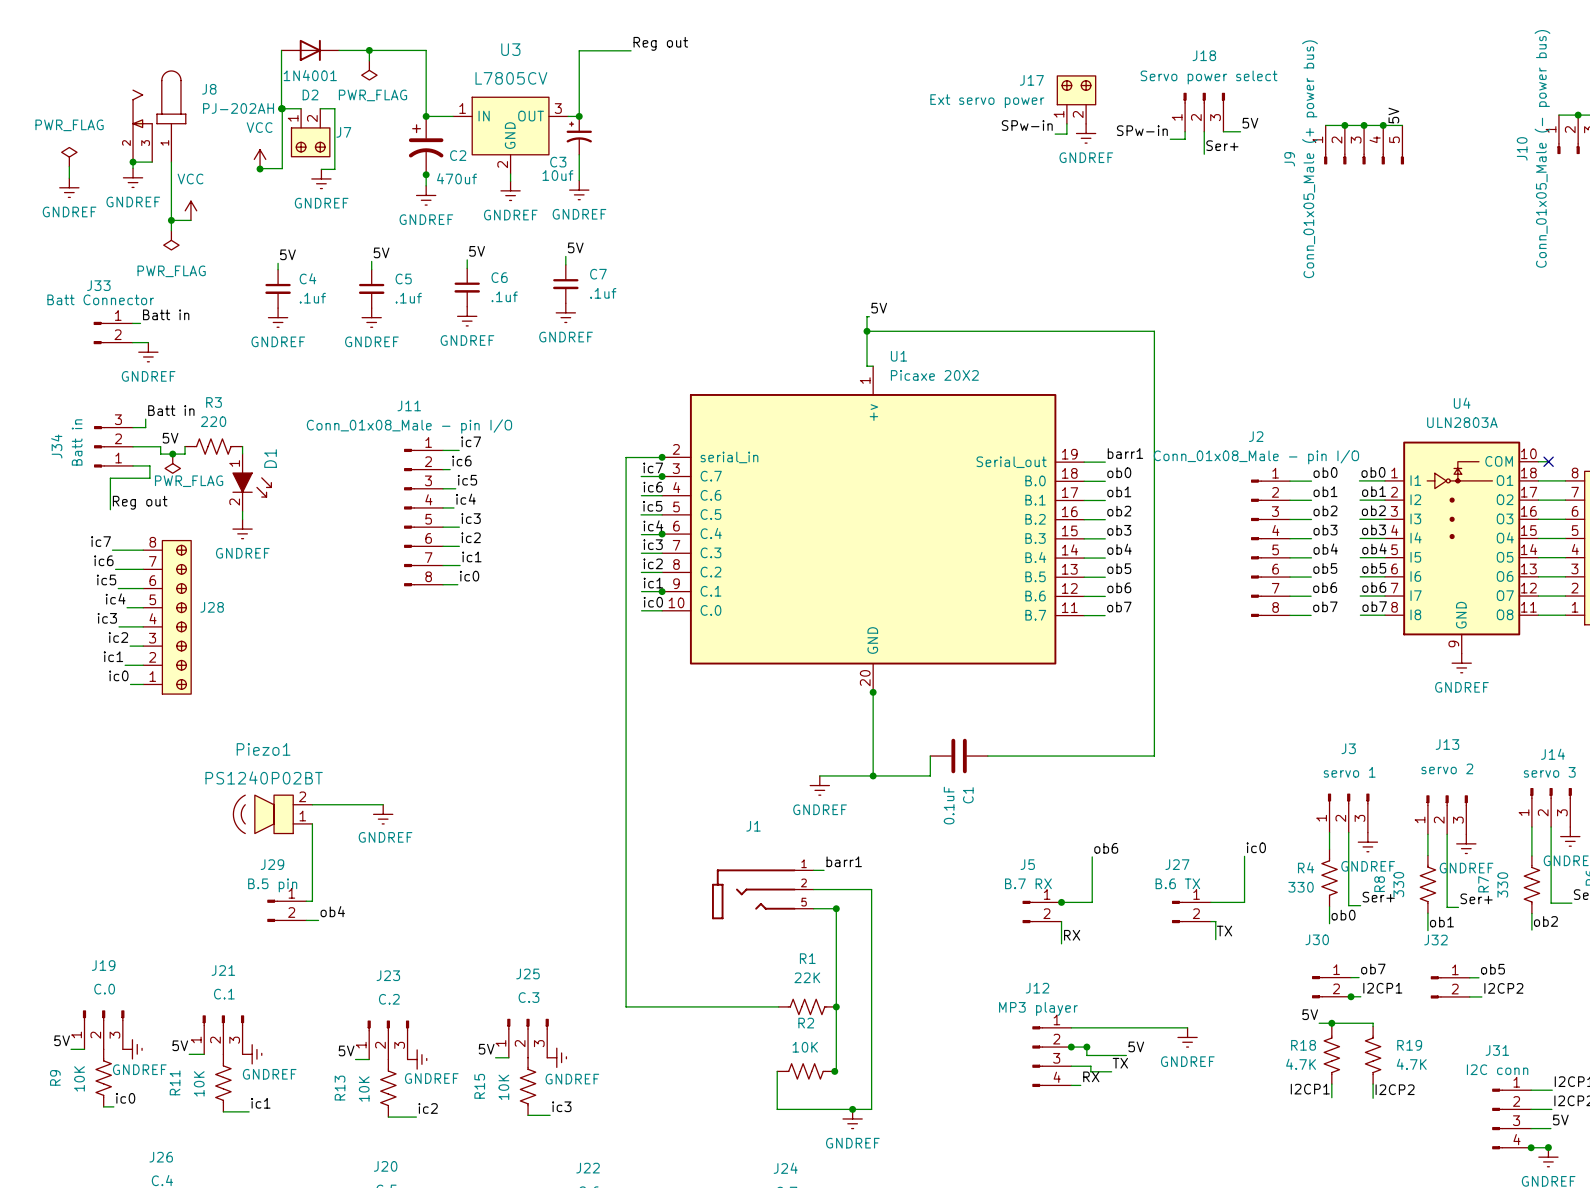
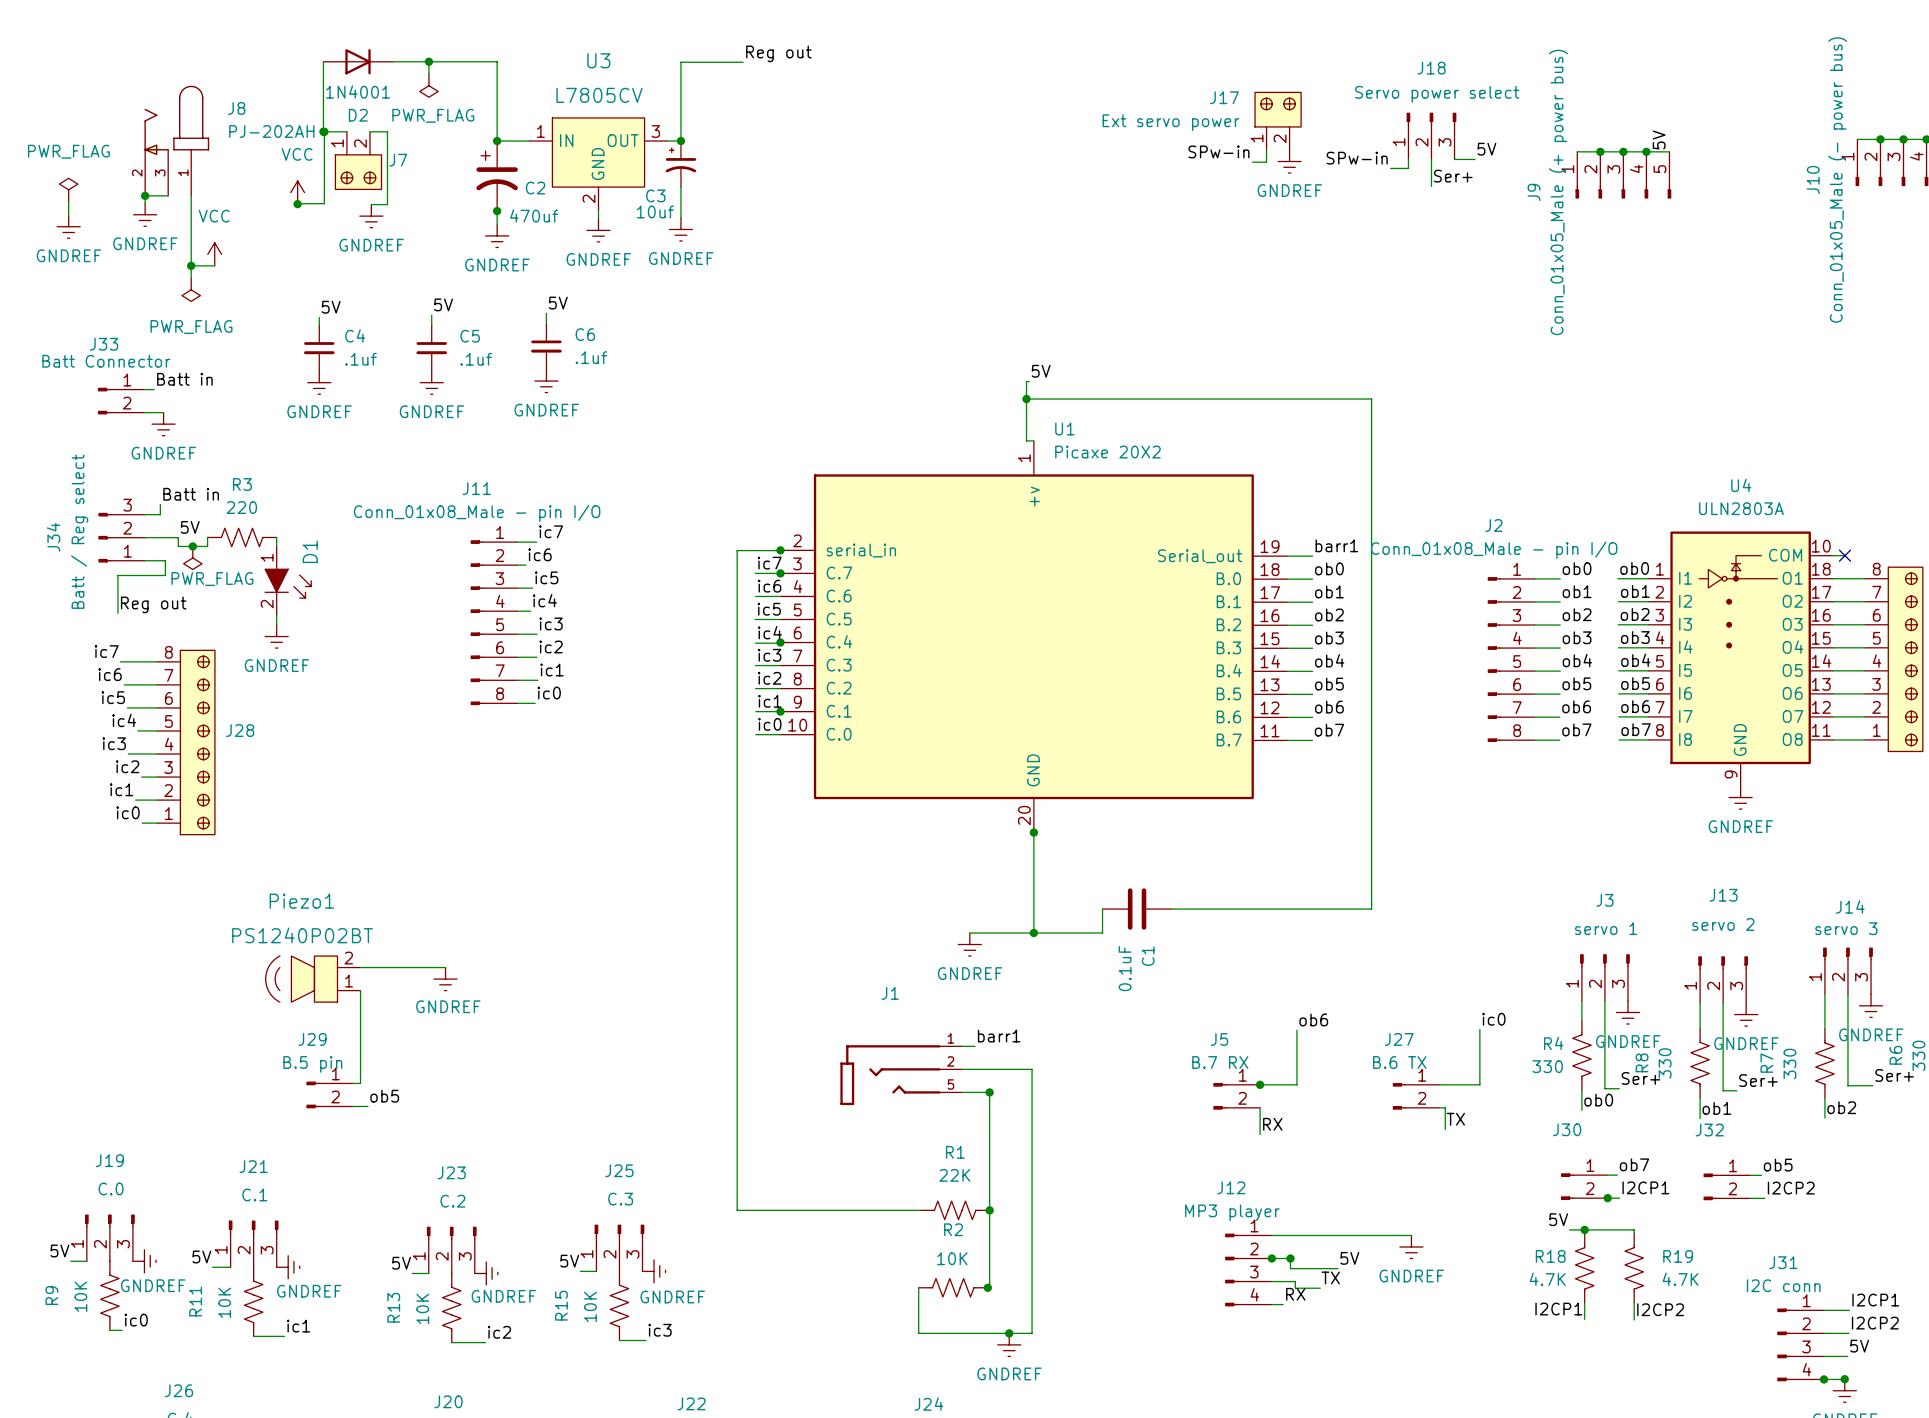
label: 5V (575, 247) -> none
wire: (565, 256) (565, 264) -> none
C7: .1uf (565, 284) -> none
power symbol: GNDREF (565, 312) -> none
J34 value: Batt in (77, 442) -> Batt / Reg select (79, 531)
label: ob4 (332, 911) -> ob5 (384, 1096)

